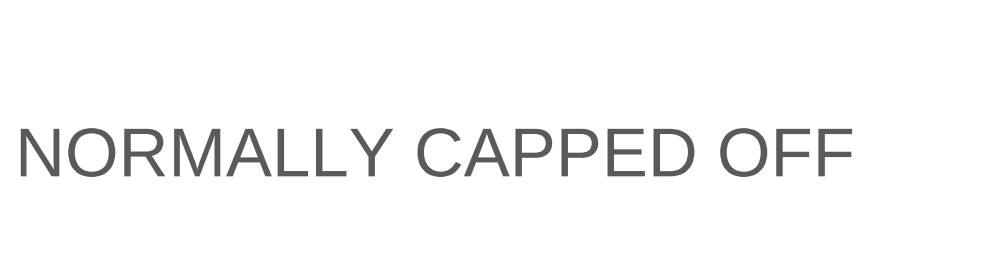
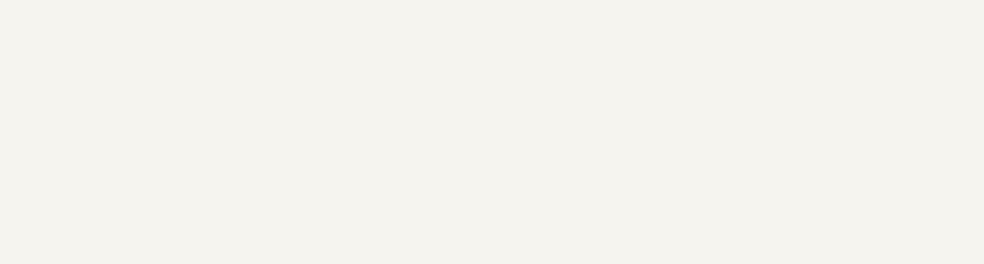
text: NORMALLY CAPPED OFF (436, 152) -> none

